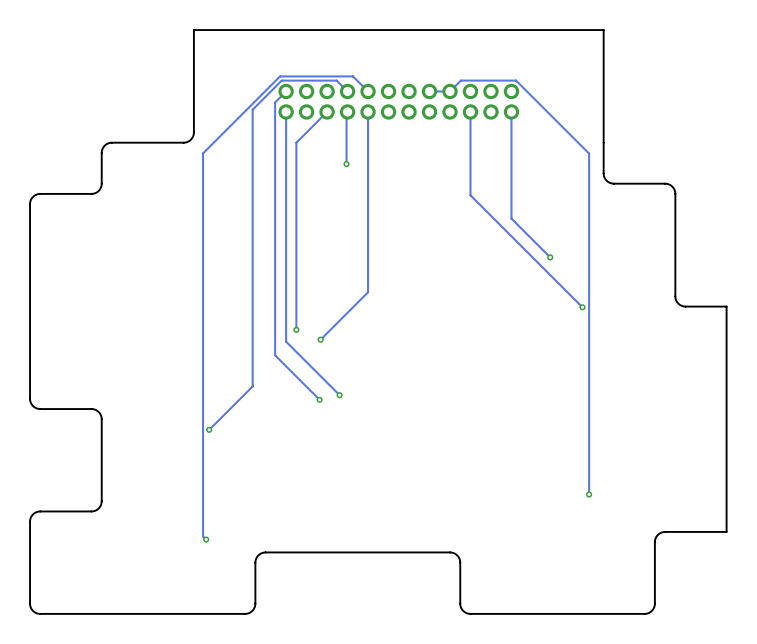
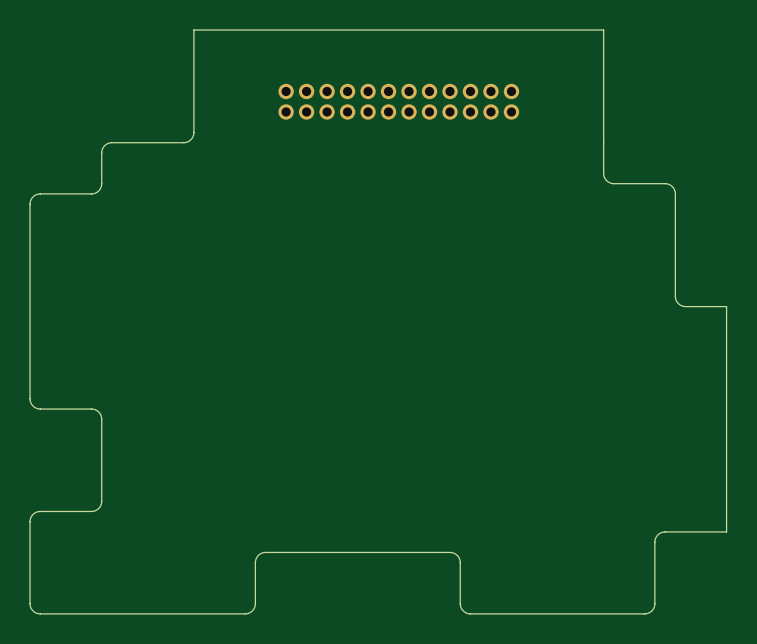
track: (286, 91) (275, 102) (275, 355) (319, 399) -> none
track: (347, 91) (336, 80) (281, 80) (252, 109) (252, 386) (209, 429) -> none
track: (368, 91) (352, 76) (280, 76) (203, 153) (203, 536) (206, 539) -> none
track: (429, 91) (450, 91) (460, 80) (516, 80) (589, 153) (589, 494) -> none
track: (286, 111) (286, 341) (339, 395) -> none
track: (327, 111) (296, 142) (296, 329) -> none
track: (347, 111) (346, 164) -> none
track: (368, 111) (368, 292) (320, 339) -> none
track: (470, 111) (470, 195) (582, 307) -> none
track: (511, 111) (511, 218) (550, 257) -> none
via: (346, 164) -> none
via: (550, 257) -> none
via: (582, 307) -> none
via: (296, 329) -> none
via: (320, 339) -> none
via: (339, 395) -> none
via: (319, 399) -> none
via: (209, 429) -> none
via: (589, 494) -> none
via: (206, 539) -> none

